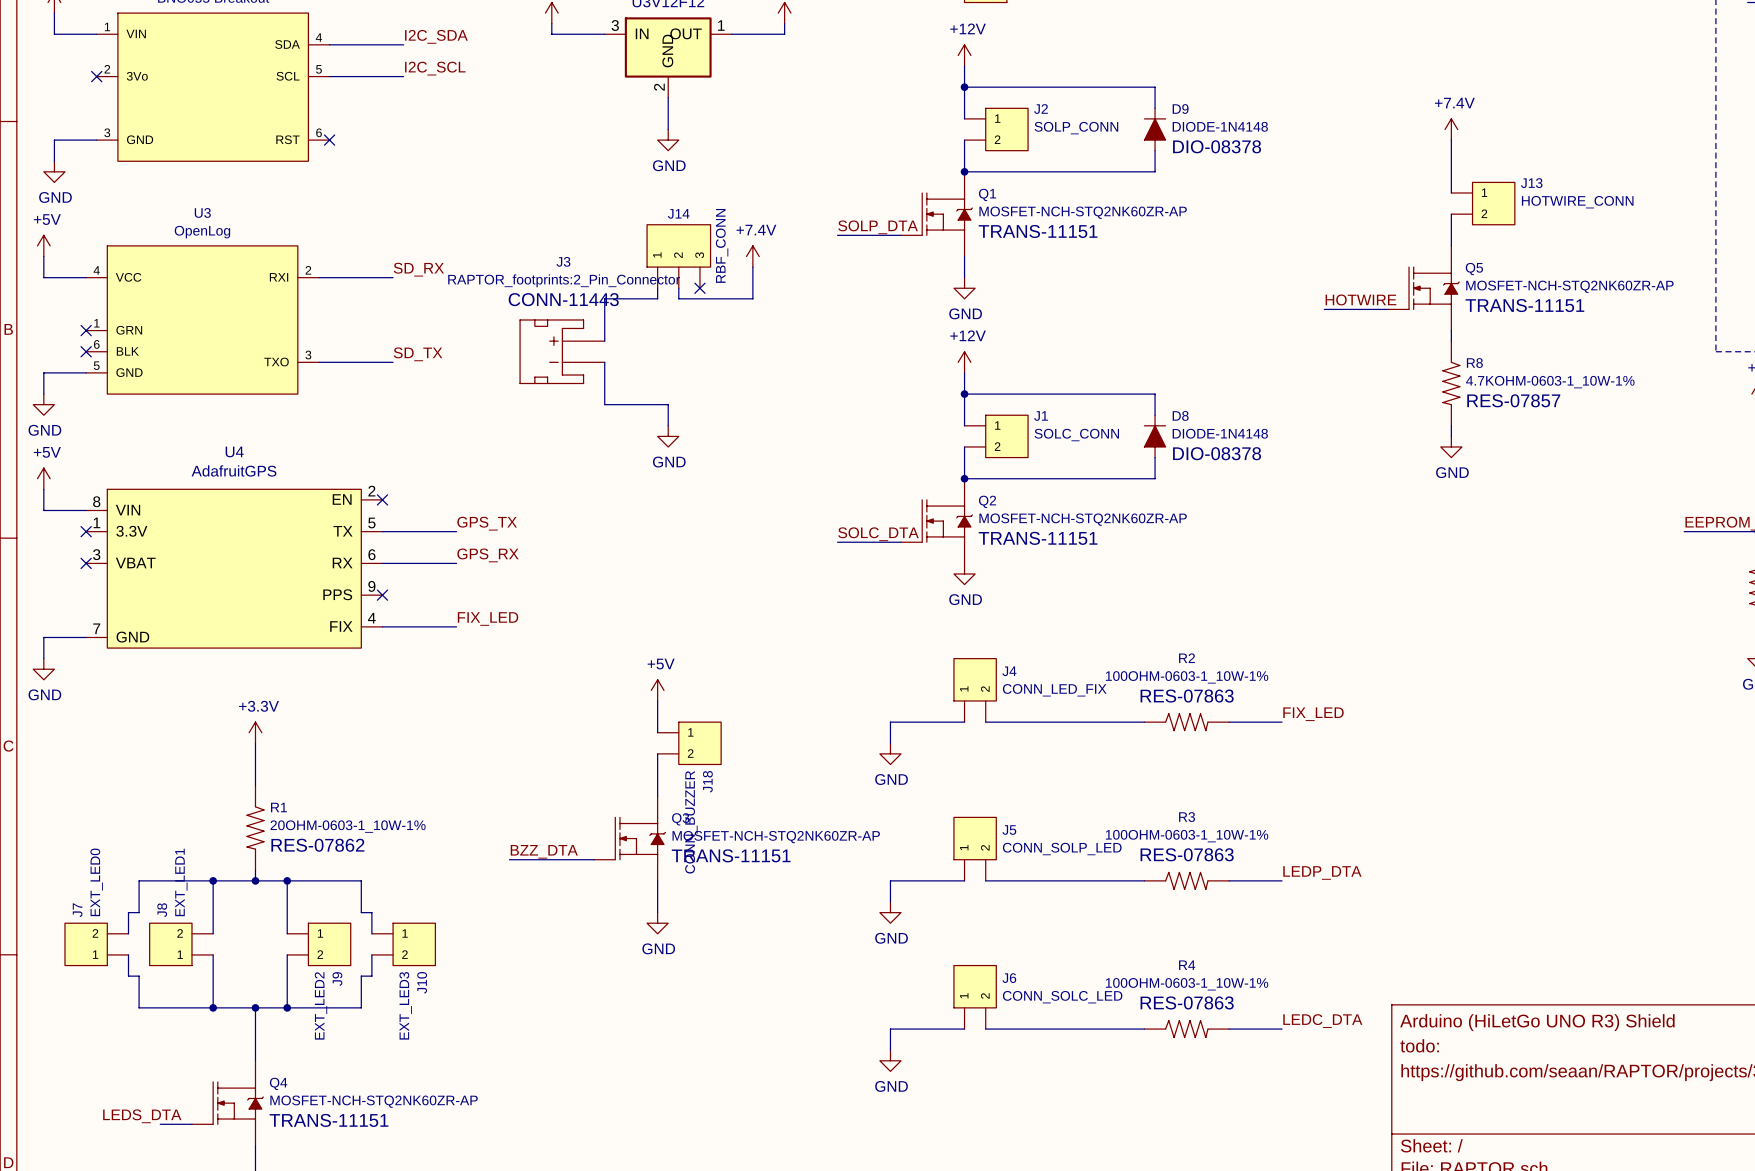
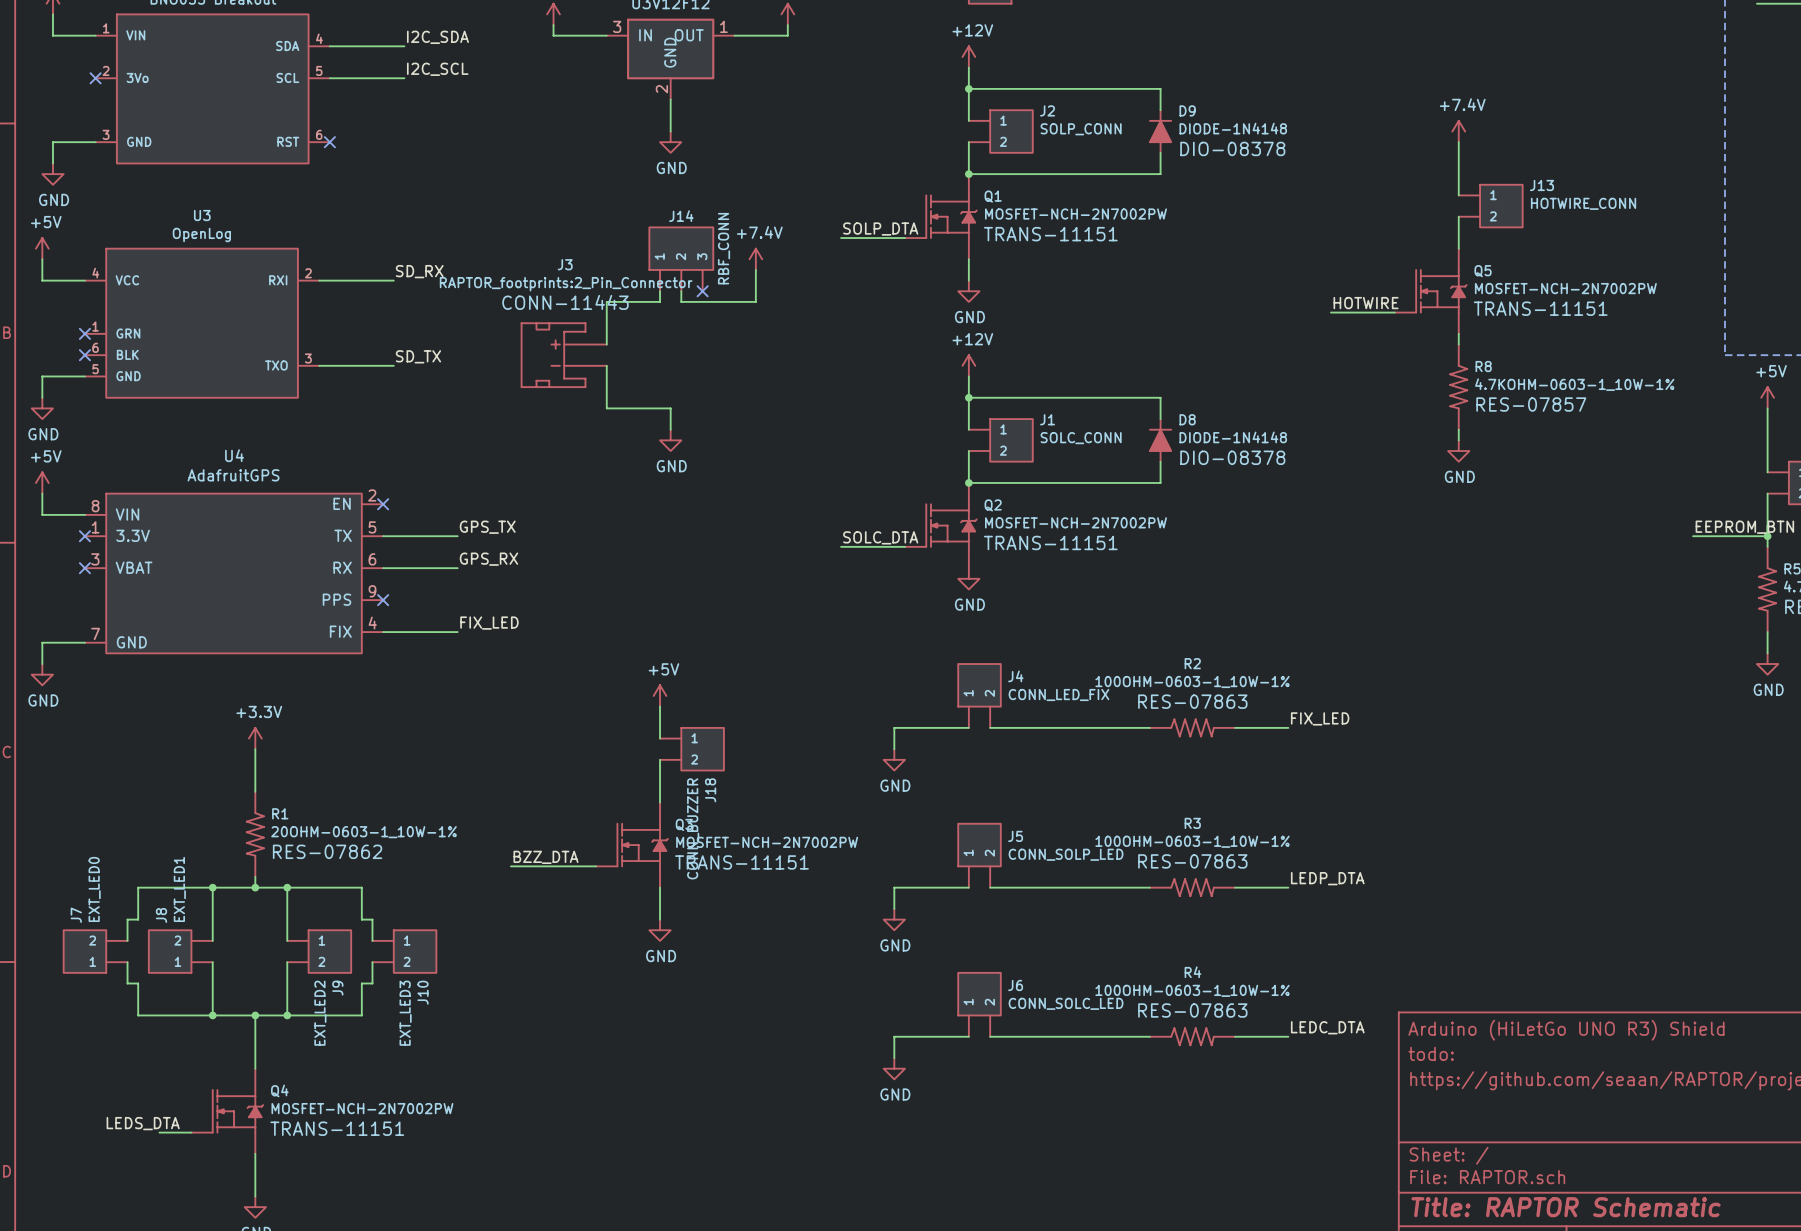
Q1 value: MOSFET-NCH-STQ2NK60ZR-AP (1083, 212) -> MOSFET-NCH-2N7002PW (1075, 214)
Q5 value: MOSFET-NCH-STQ2NK60ZR-AP (1569, 286) -> MOSFET-NCH-2N7002PW (1565, 288)
Q2 value: MOSFET-NCH-STQ2NK60ZR-AP (1083, 519) -> MOSFET-NCH-2N7002PW (1075, 522)
Q3 value: MOSFET-NCH-STQ2NK60ZR-AP (776, 837) -> MOSFET-NCH-2N7002PW (767, 842)
Q4 value: MOSFET-NCH-STQ2NK60ZR-AP (374, 1101) -> MOSFET-NCH-2N7002PW (362, 1108)

